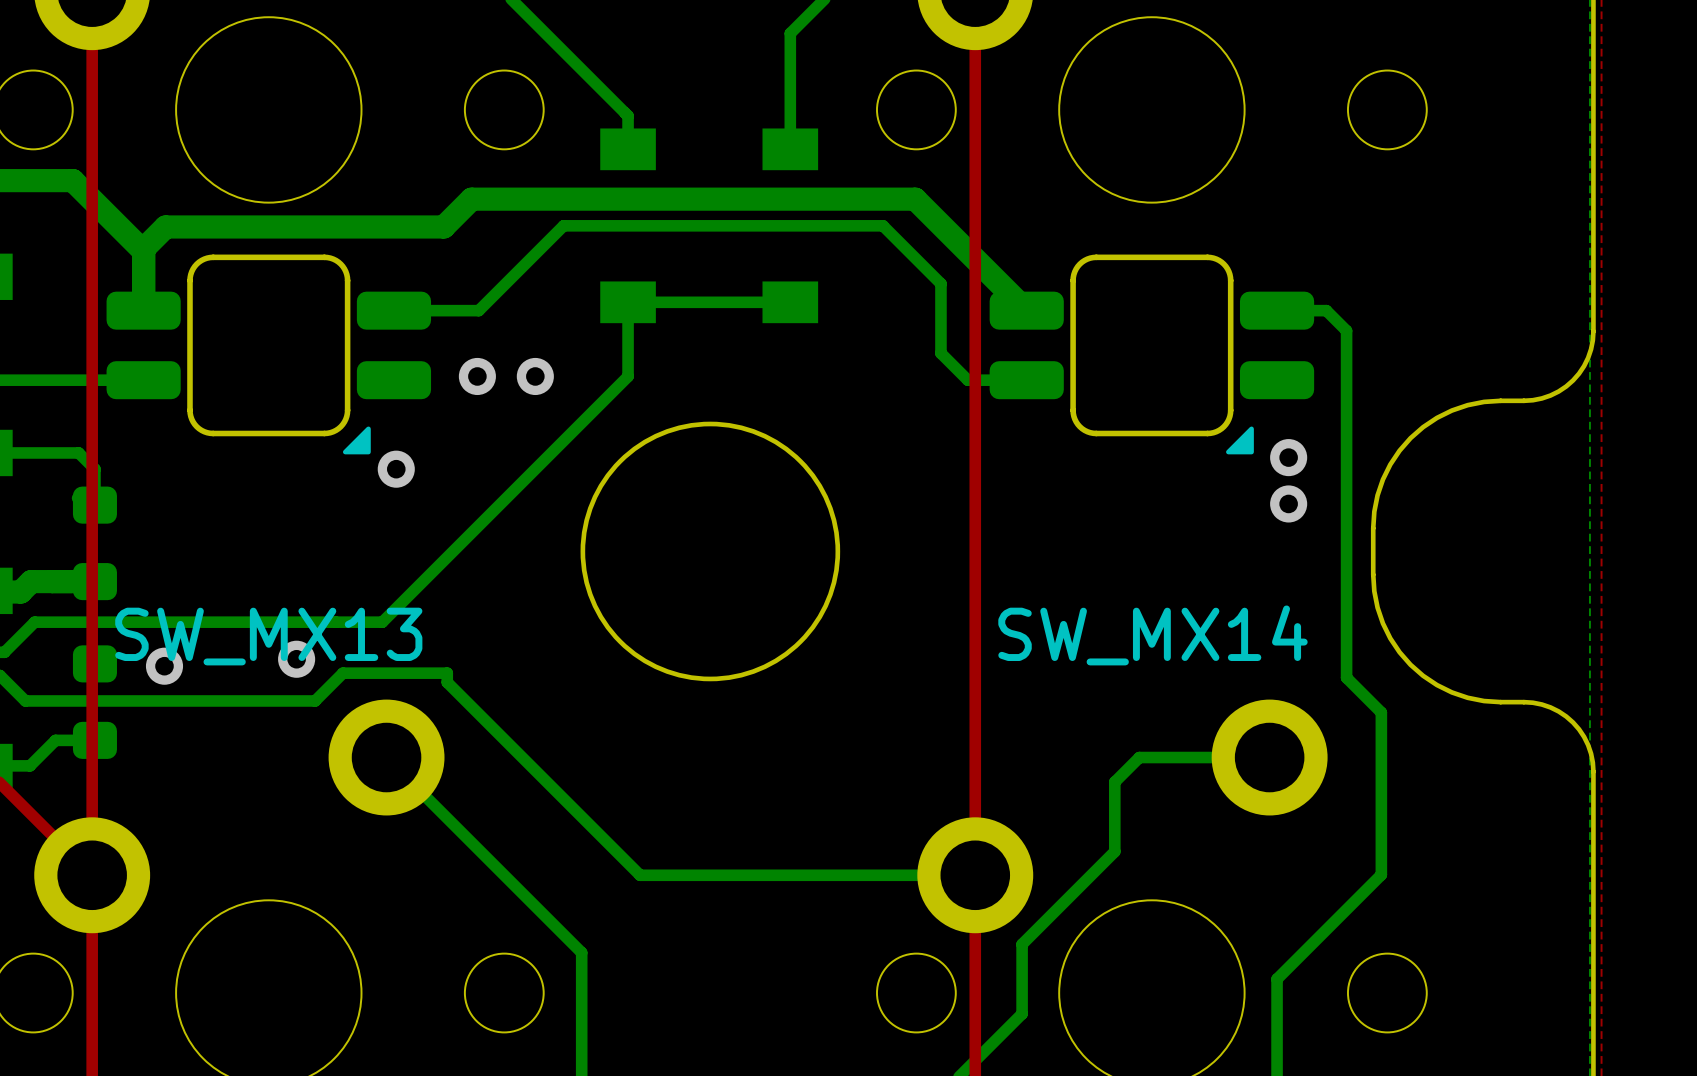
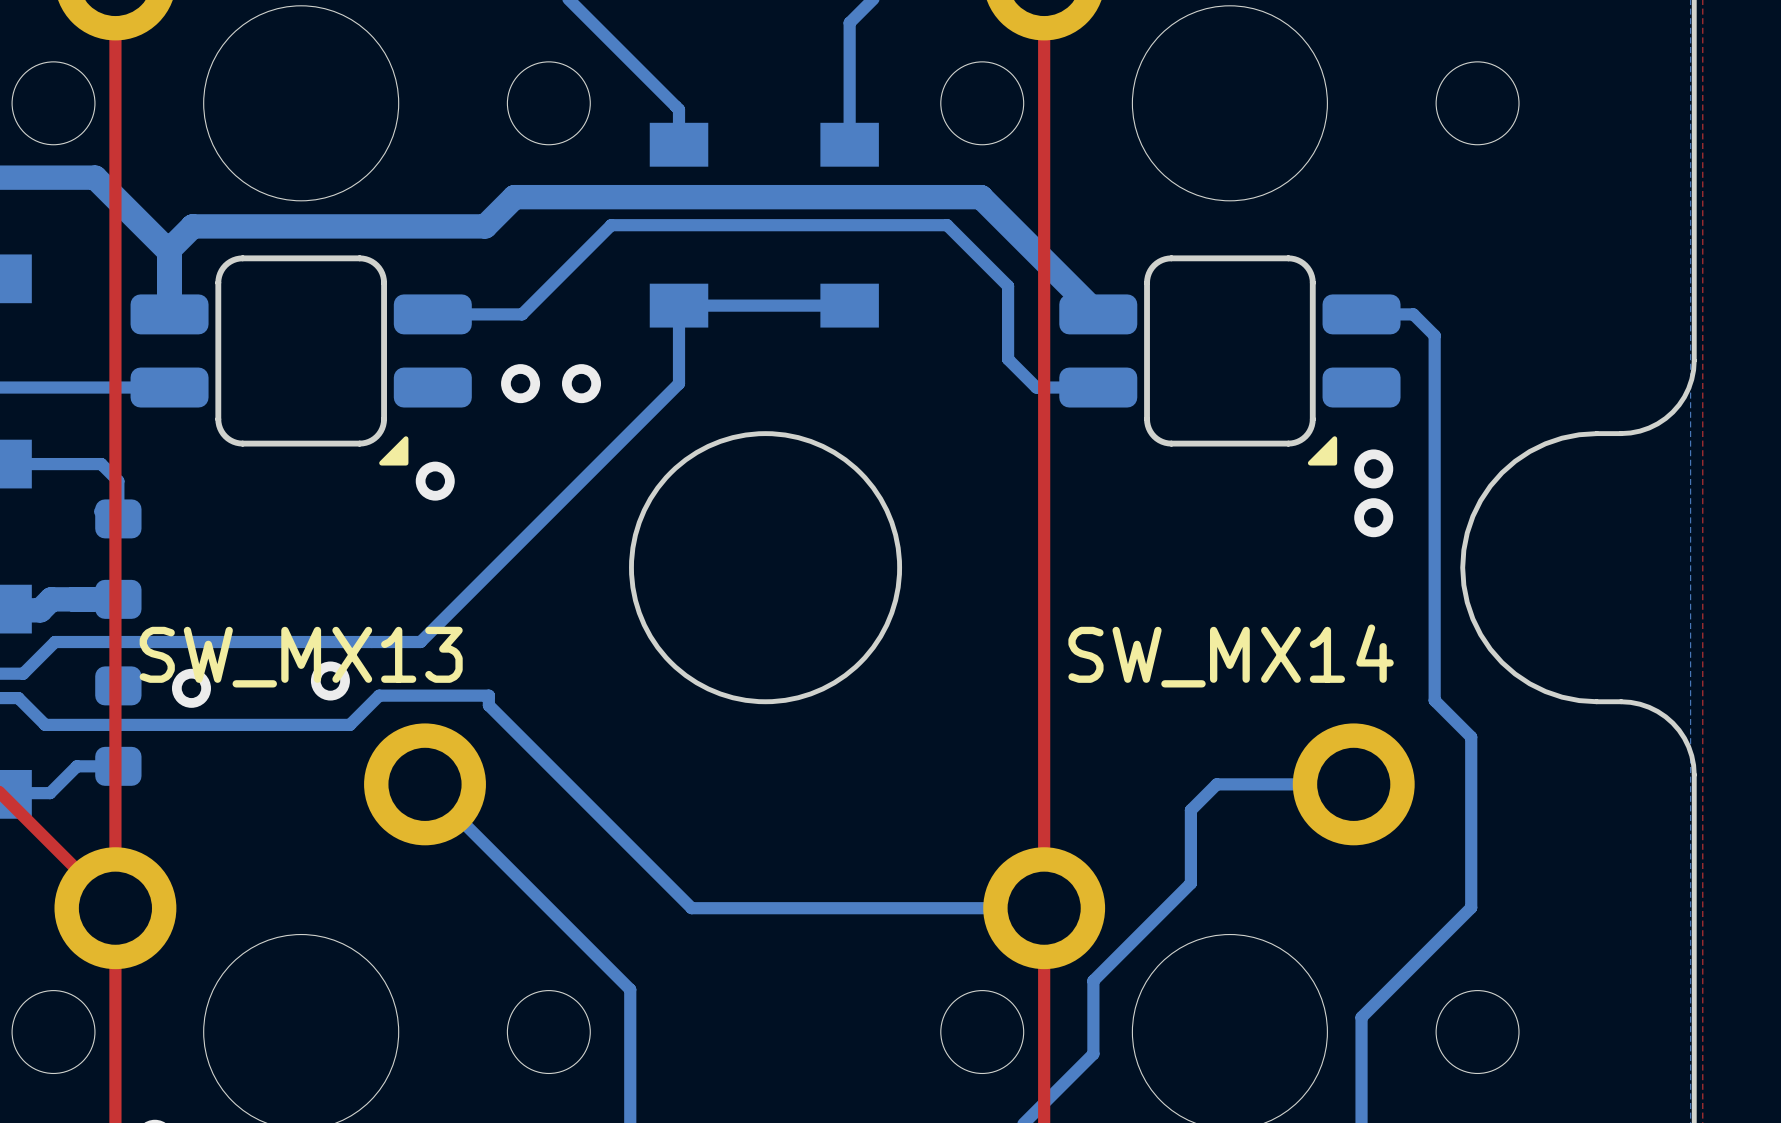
board edge: (1593, 331) (1591, 349) (1584, 366) (1573, 380) (1558, 391) (1532, 400) (1484, 401) (1467, 405) (1451, 410) (1423, 427) (1399, 450) (1390, 464) (1377, 495) (1374, 511) (1374, 591) (1382, 623) (1399, 652) (1423, 675) (1451, 692) (1484, 701) (1523, 702) -> (1694, 336) (1693, 370) (1688, 388) (1679, 404) (1665, 418) (1640, 431) (1579, 434) (1562, 438) (1529, 451) (1515, 461) (1490, 486) (1472, 516) (1467, 532) (1463, 550) (1463, 585) (1472, 618) (1490, 649) (1515, 674) (1545, 691) (1579, 700) (1596, 701)
board edge: (1523, 702) (1550, 707) (1573, 722) (1588, 745) (1593, 771) -> (1596, 701) (1640, 704) (1657, 711) (1672, 723) (1684, 738) (1691, 755) (1694, 799)

